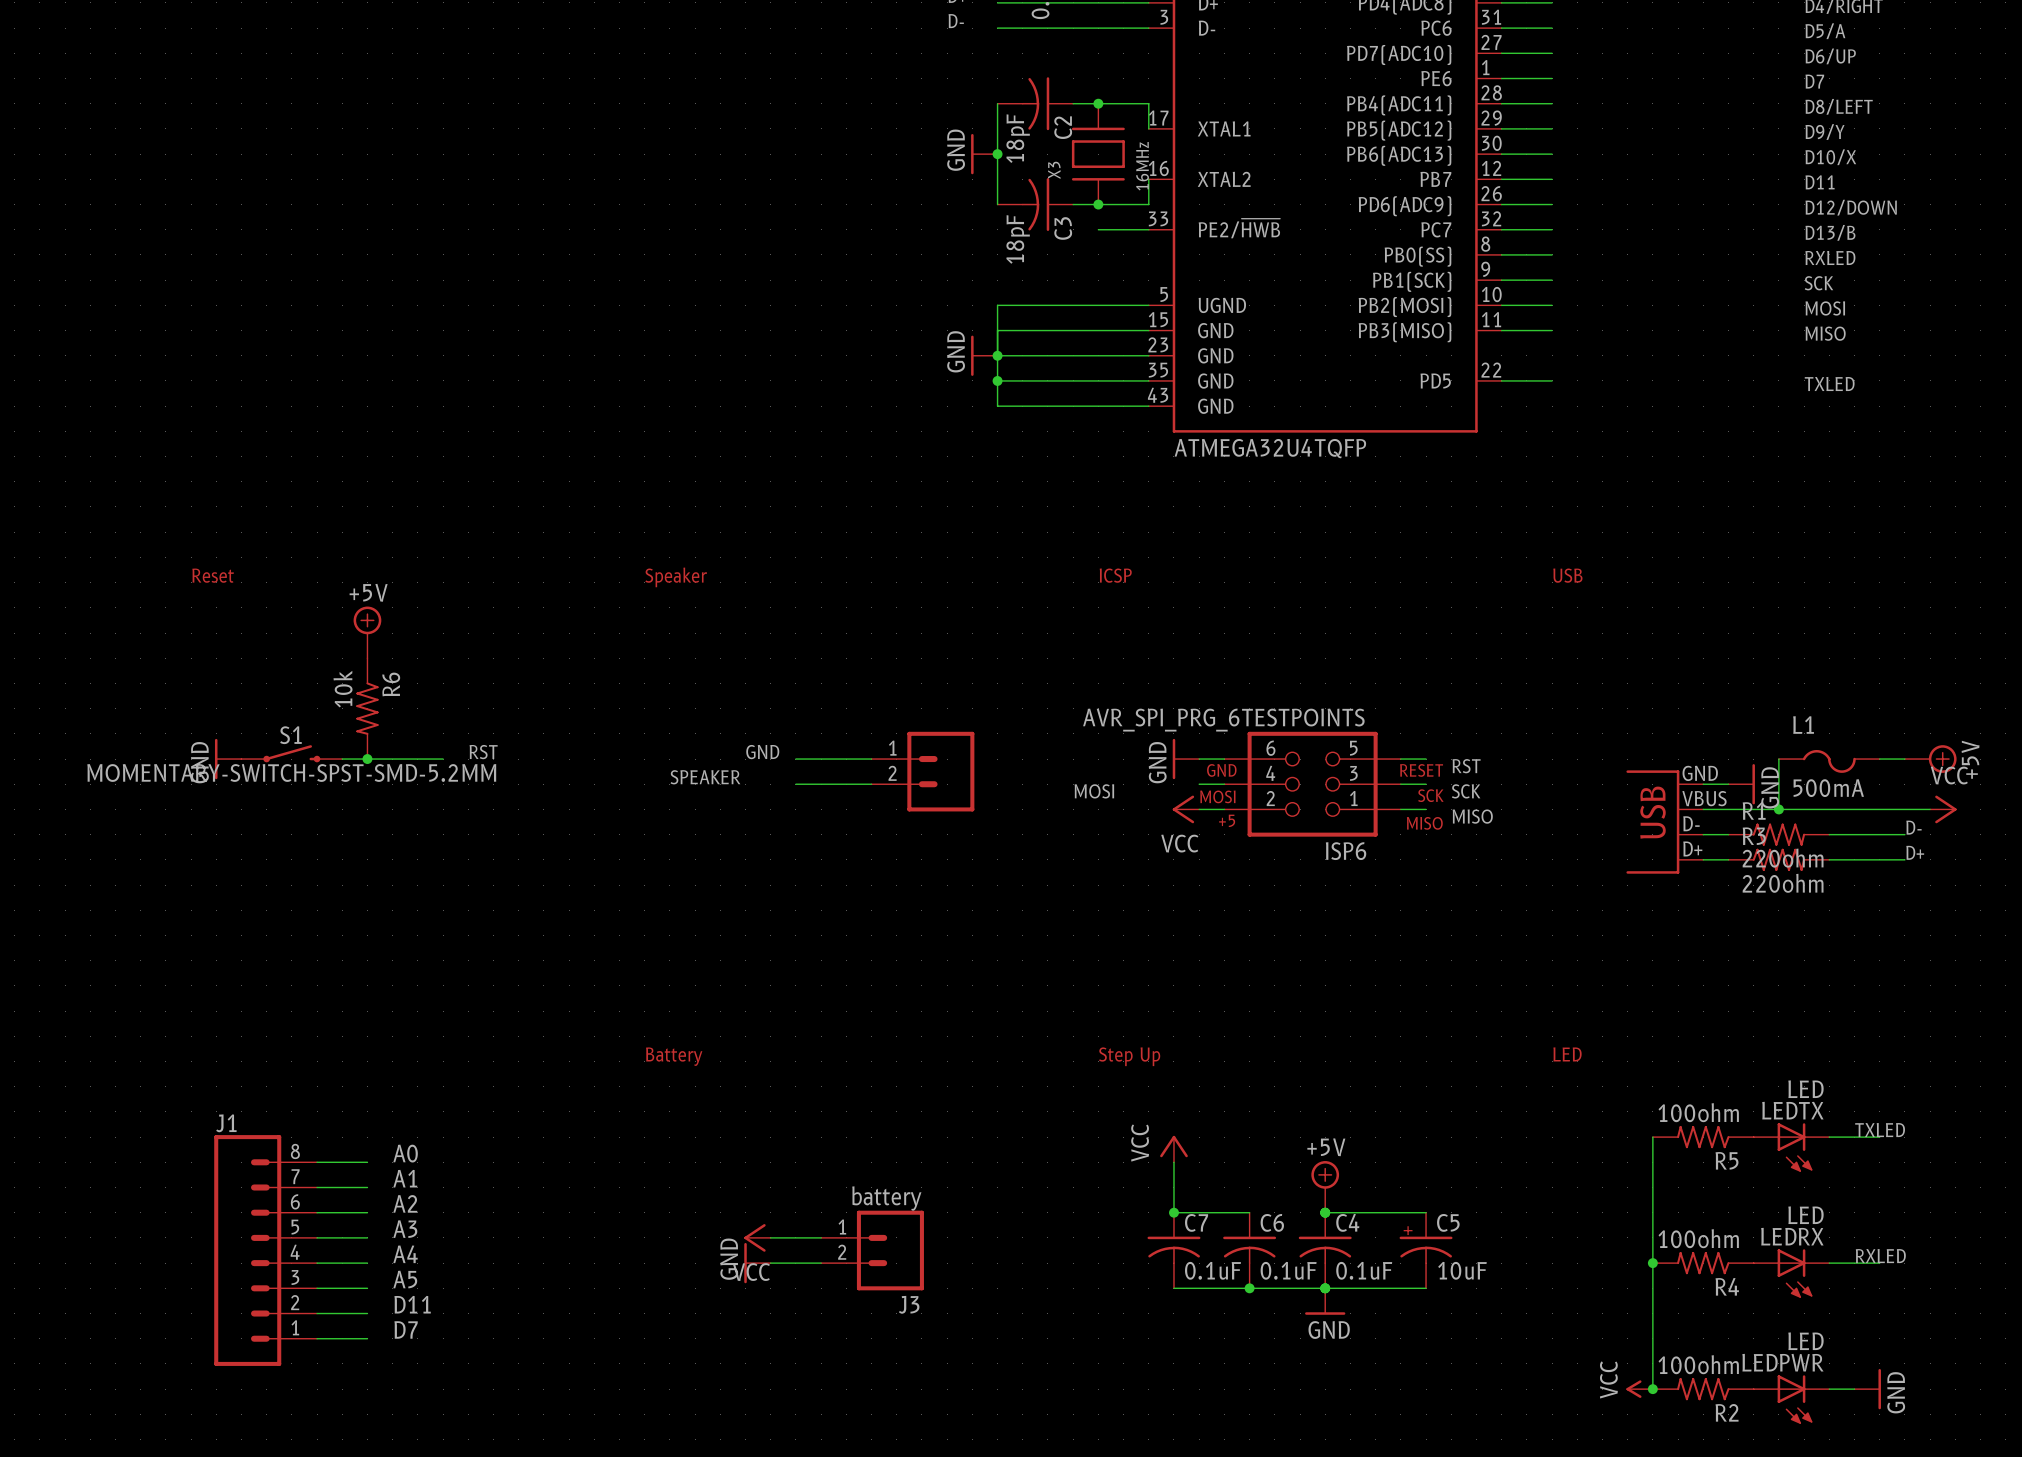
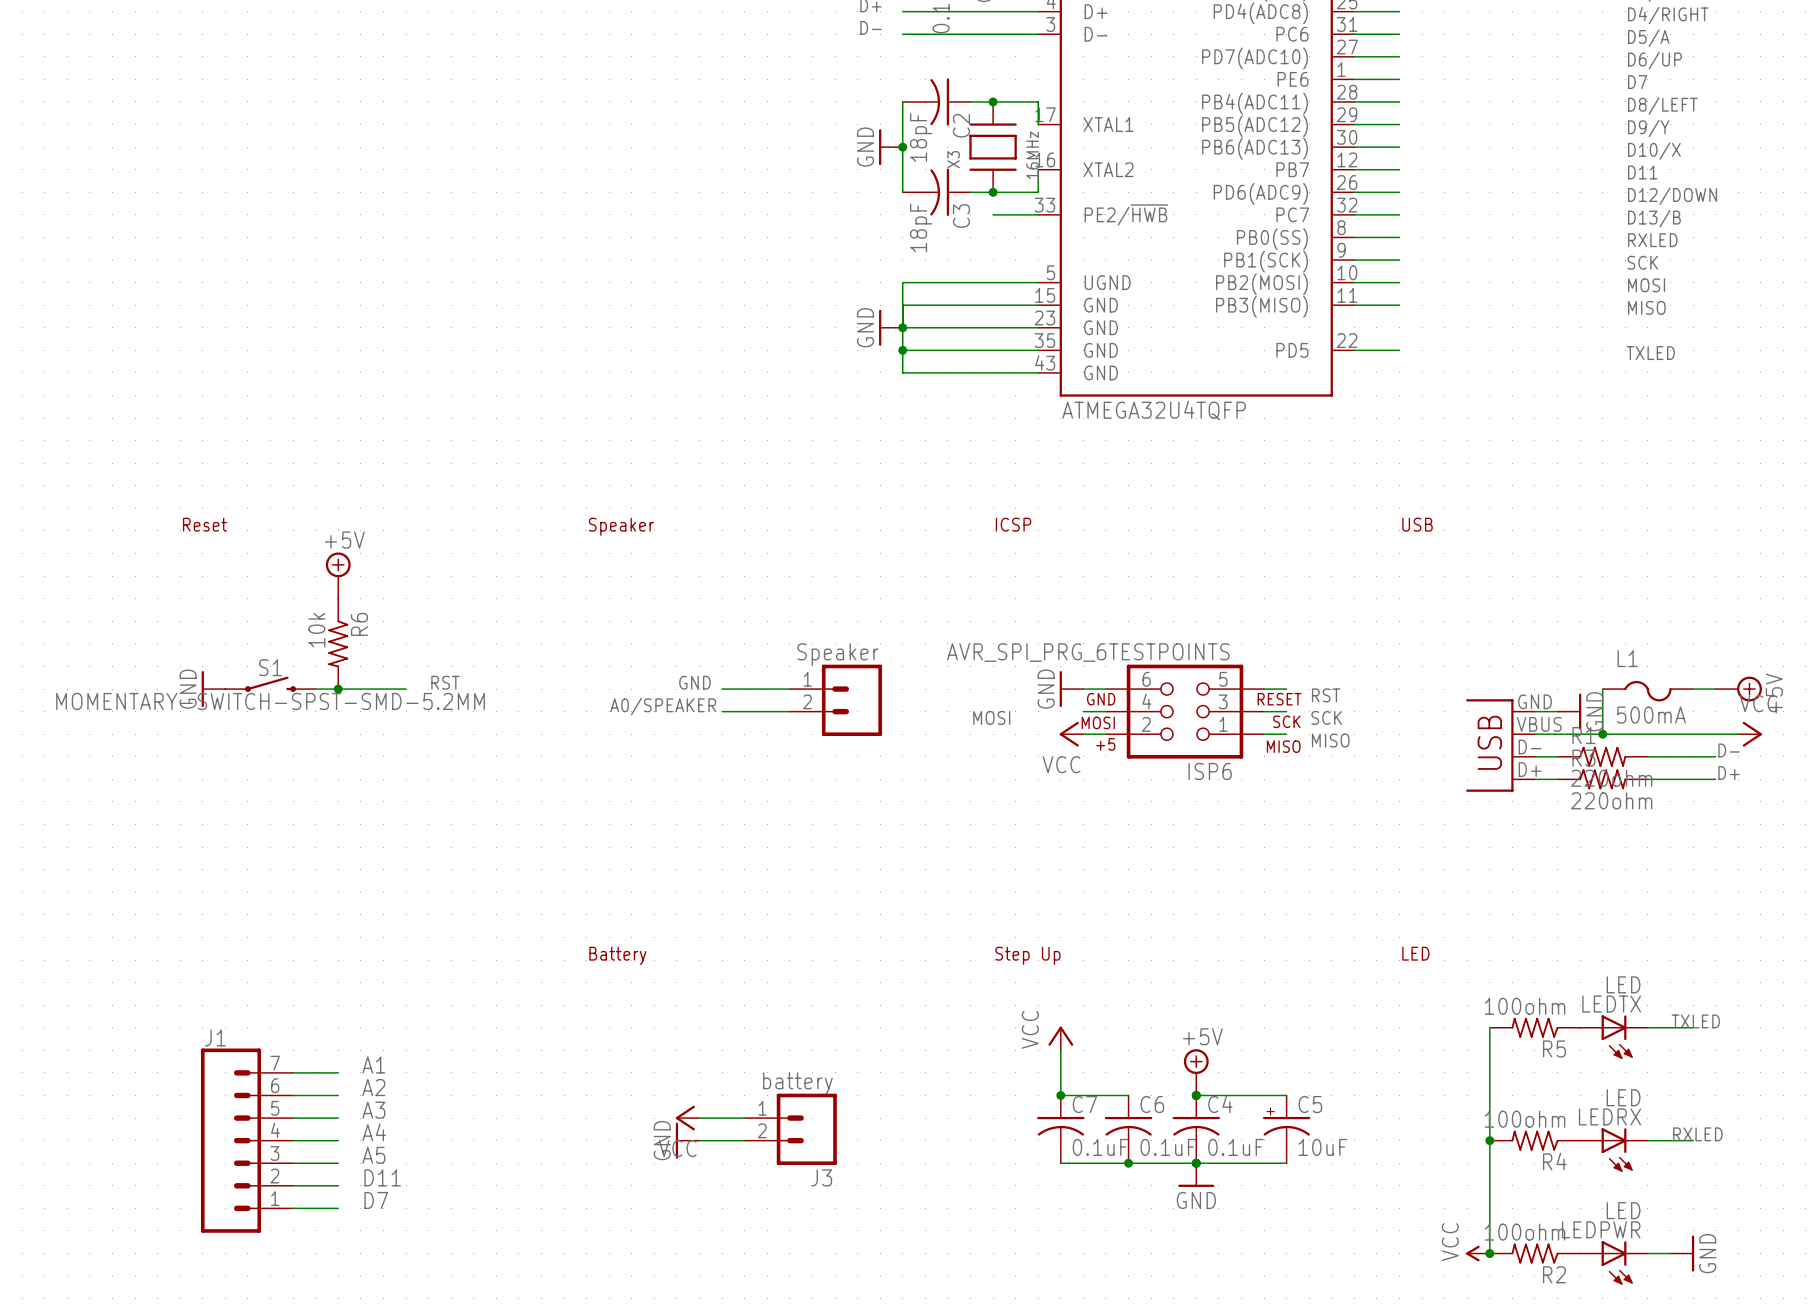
part value: none -> Speaker (838, 654)
label: SPEAKER (705, 777) -> A0/SPEAKER (663, 706)
J1 symbol: [214, 1135, 318, 1366] -> [200, 1048, 294, 1233]
label: A0 (405, 1153) -> none
wire: (317, 1162) (367, 1162) -> none

